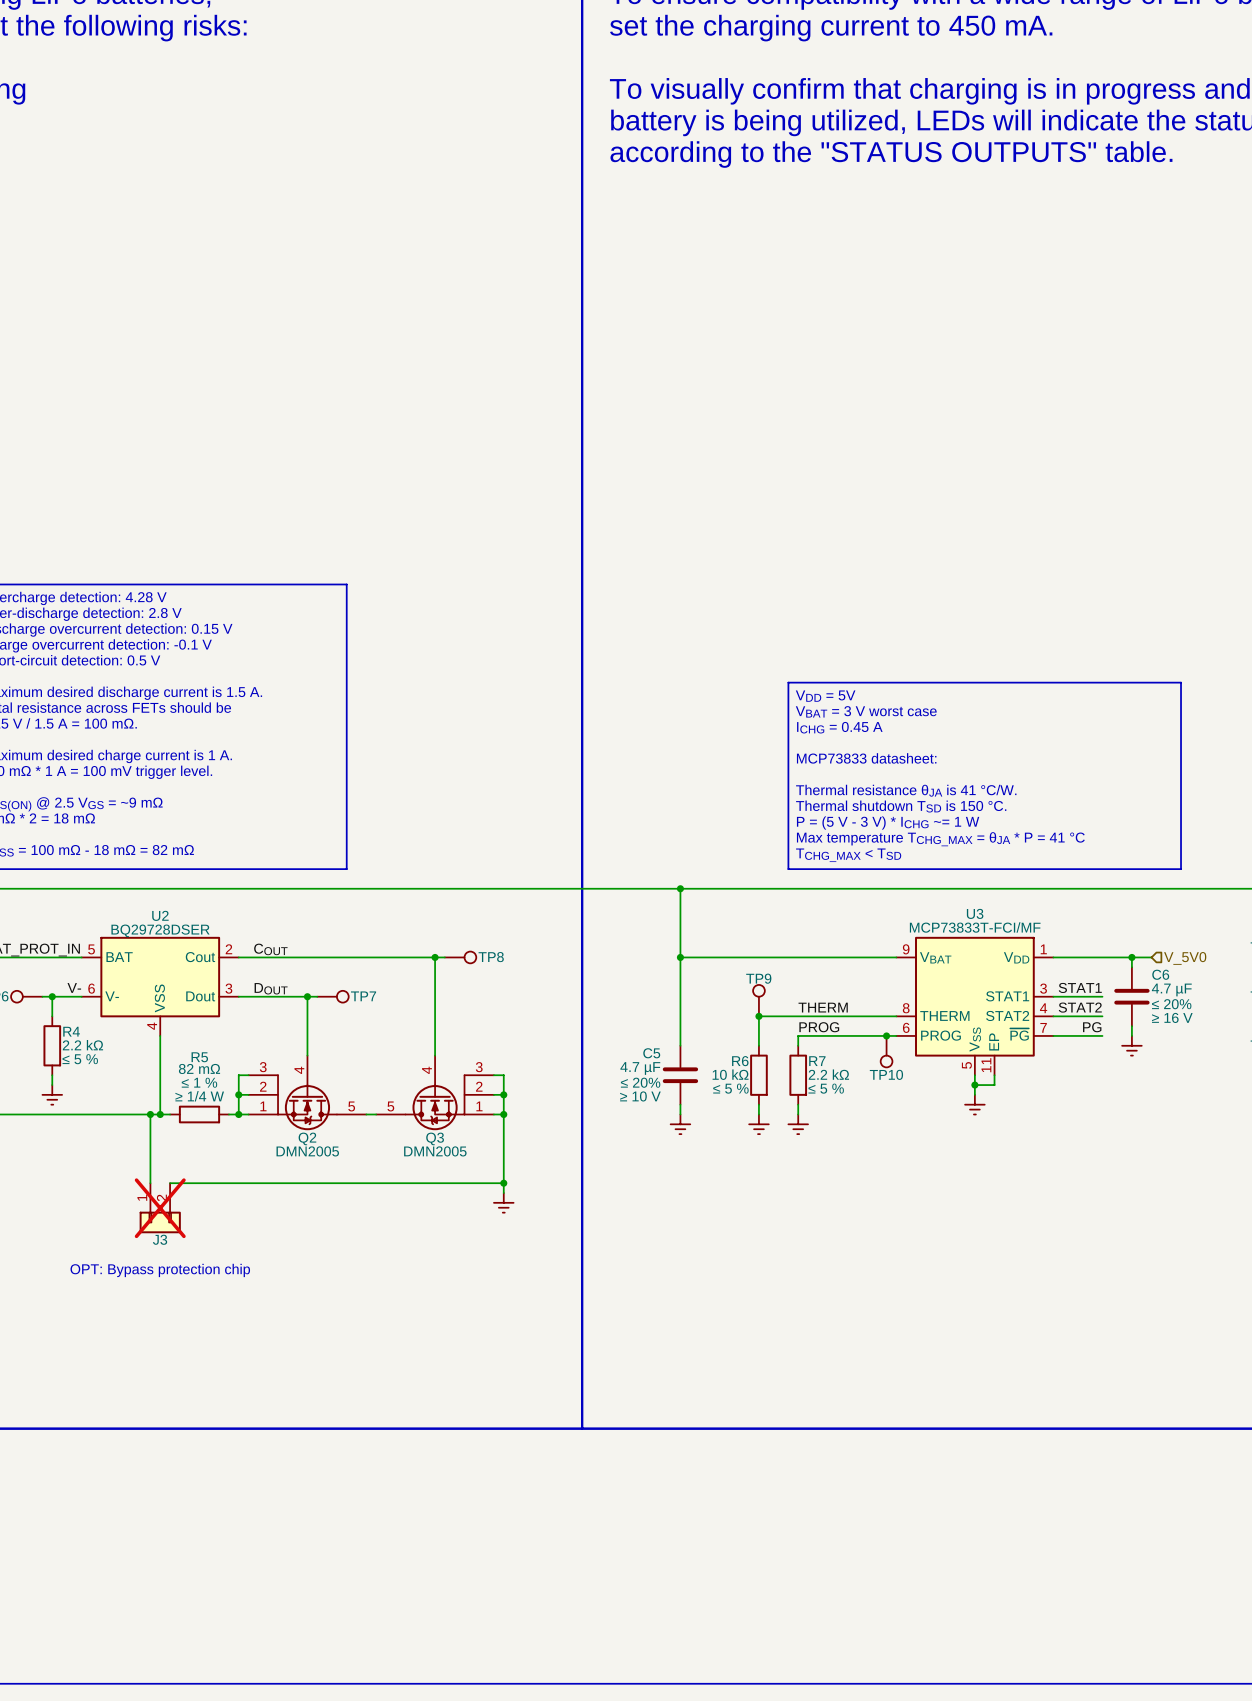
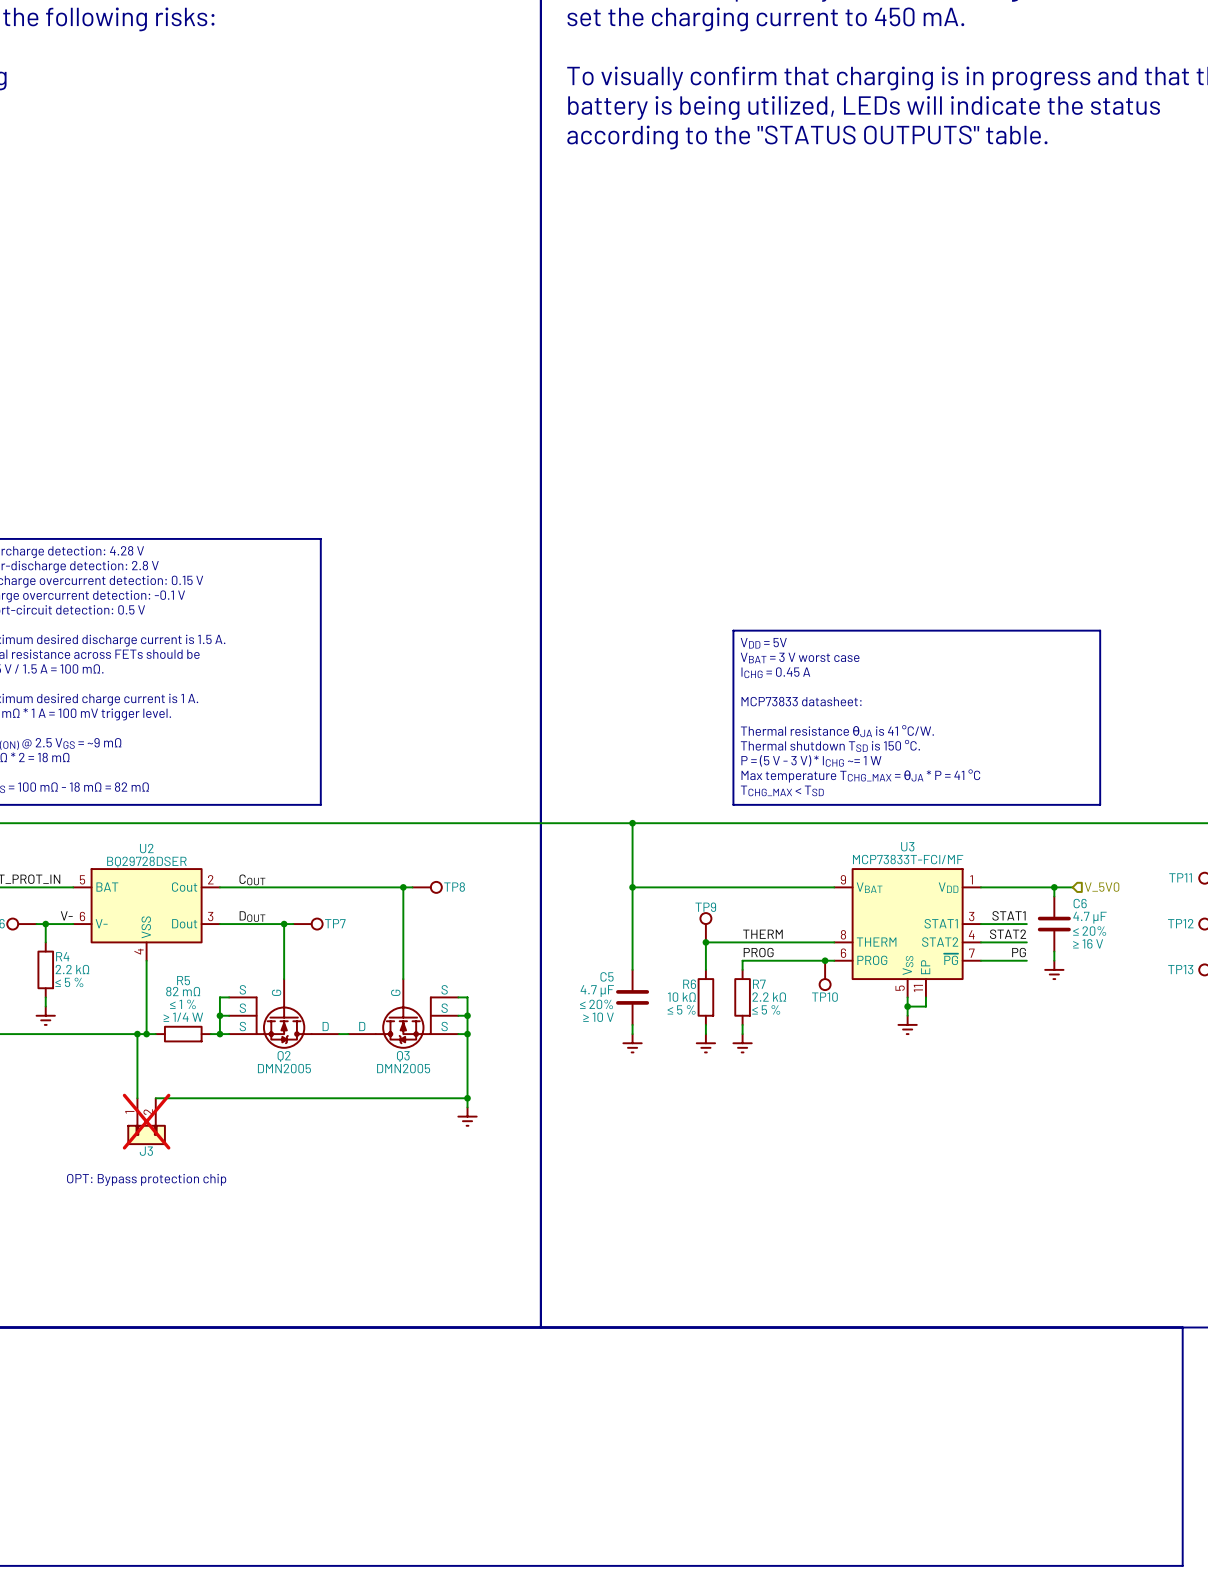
Q2 symbol: [248, 1055, 367, 1131] -> [229, 979, 340, 1049]
Q3 symbol: [376, 1055, 494, 1131] -> [348, 979, 459, 1049]

